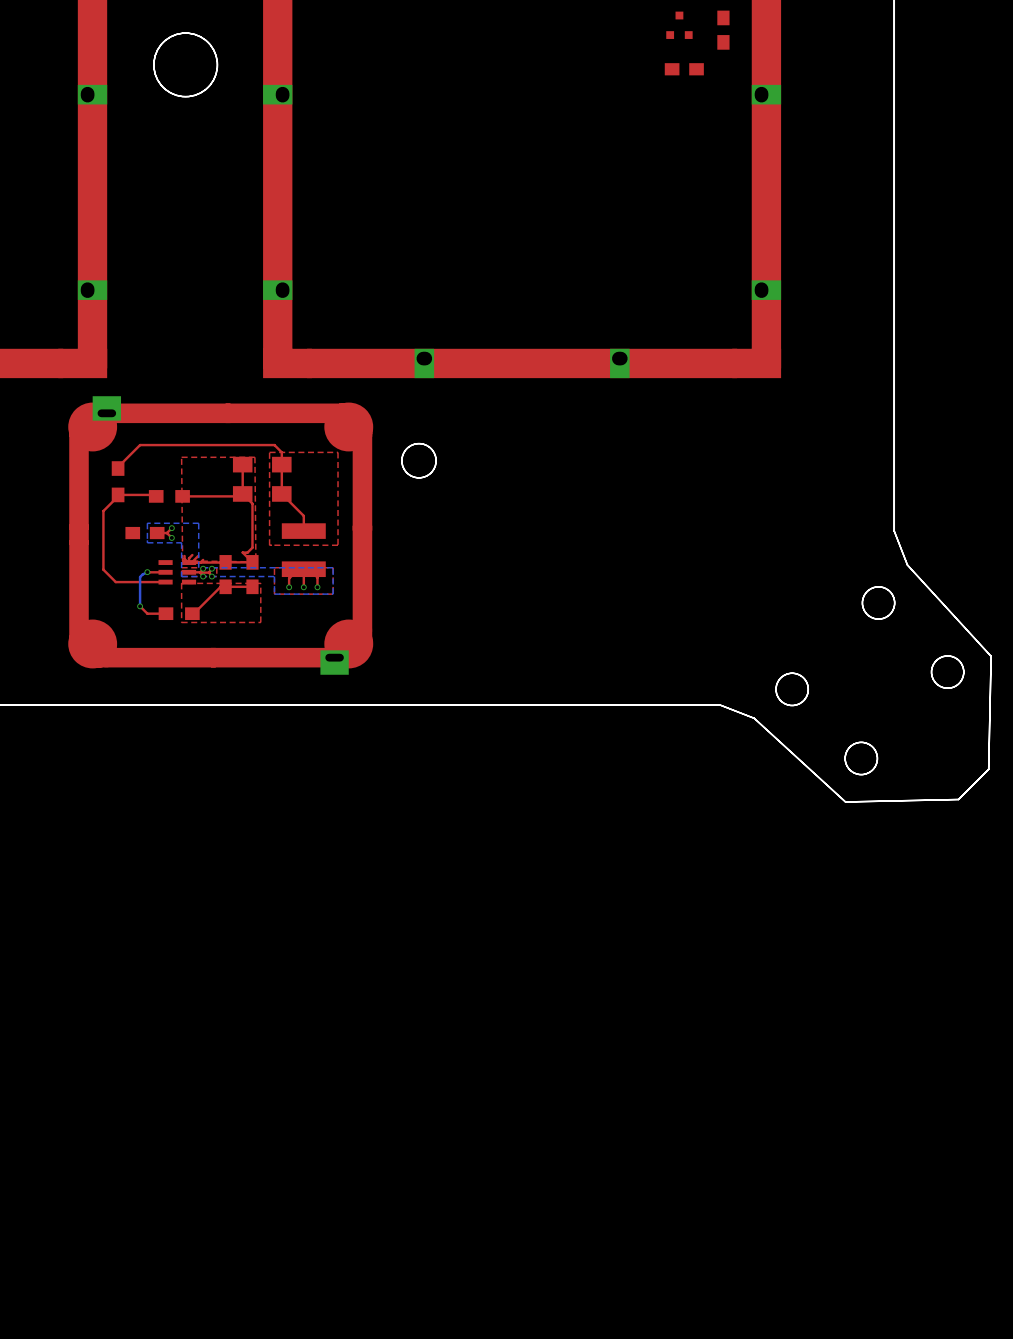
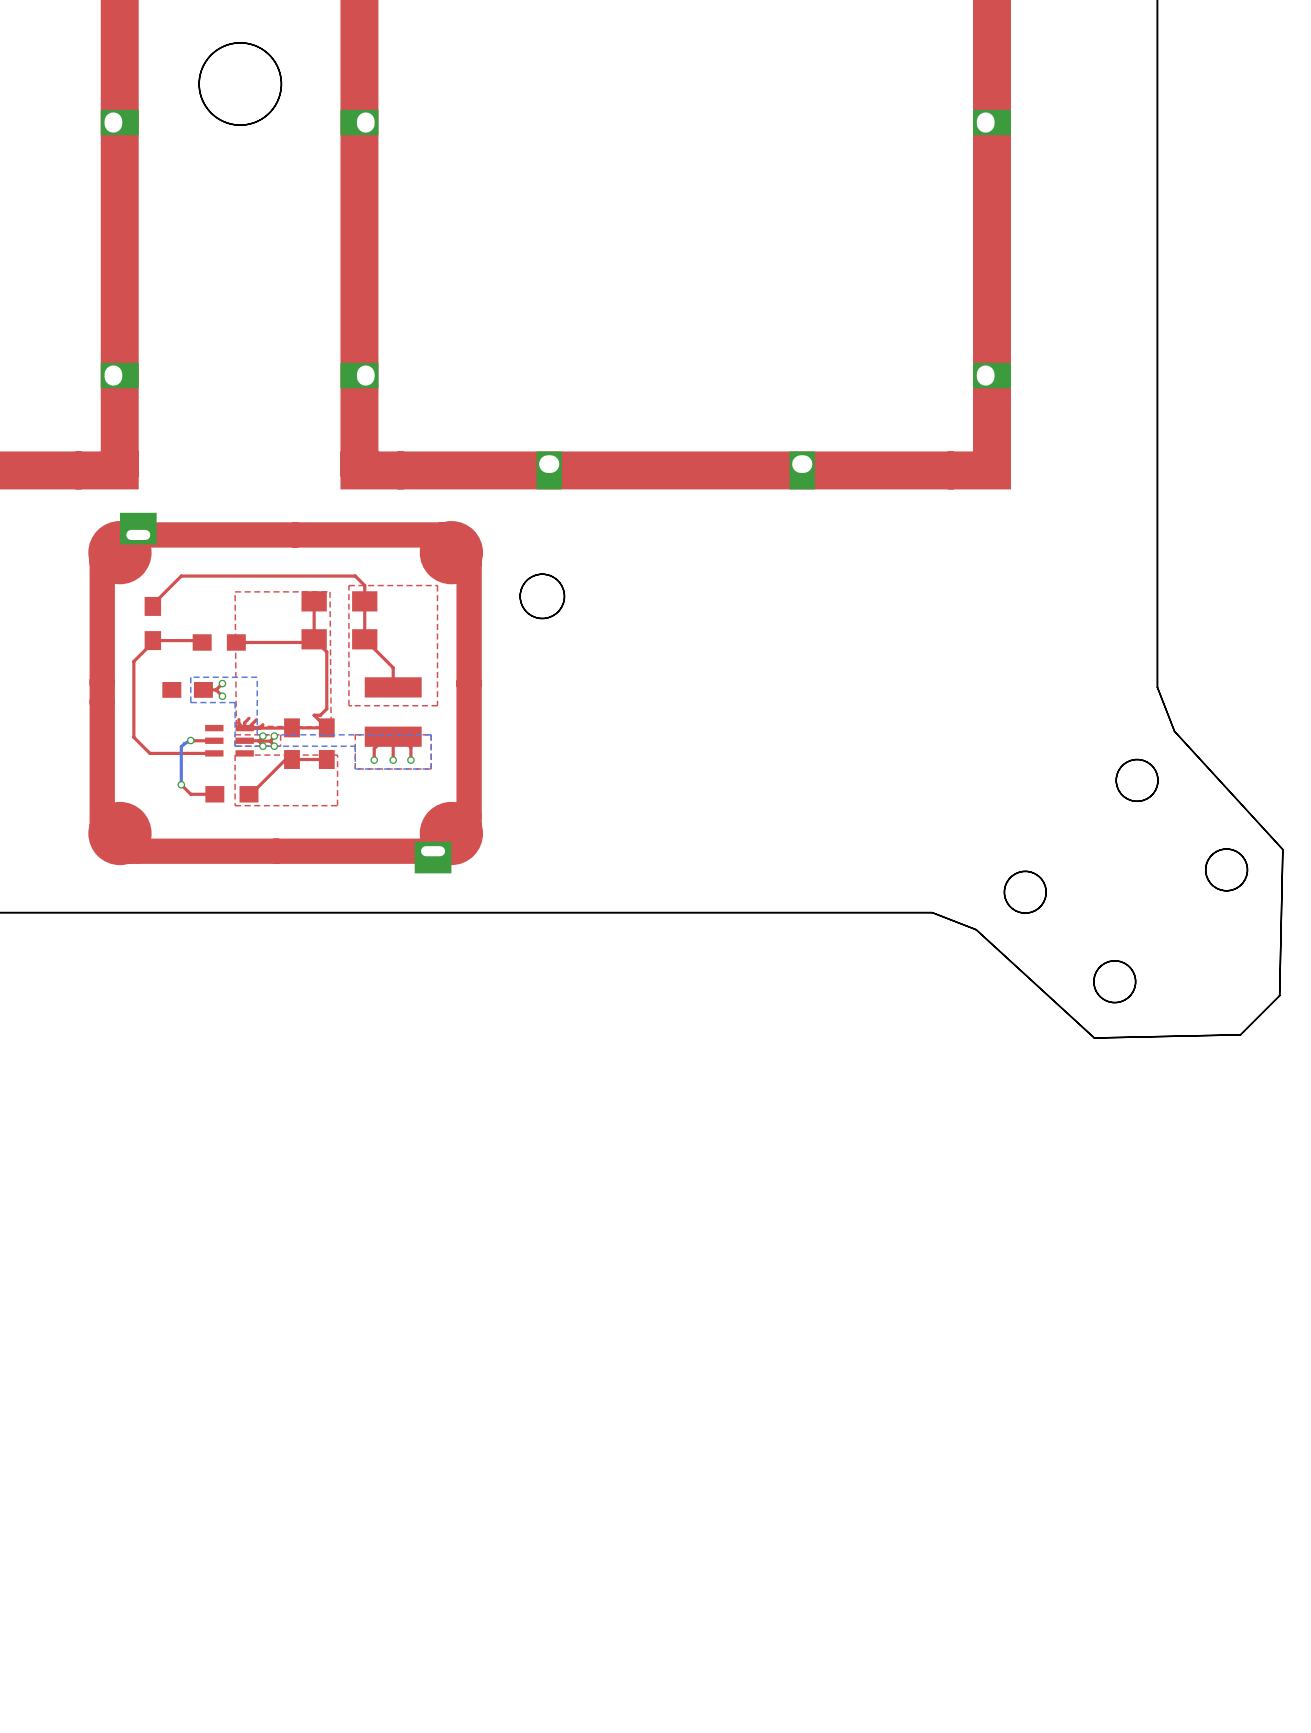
part: (679, 25) -> none
part: (723, 30) -> none
part: (684, 69) -> none

